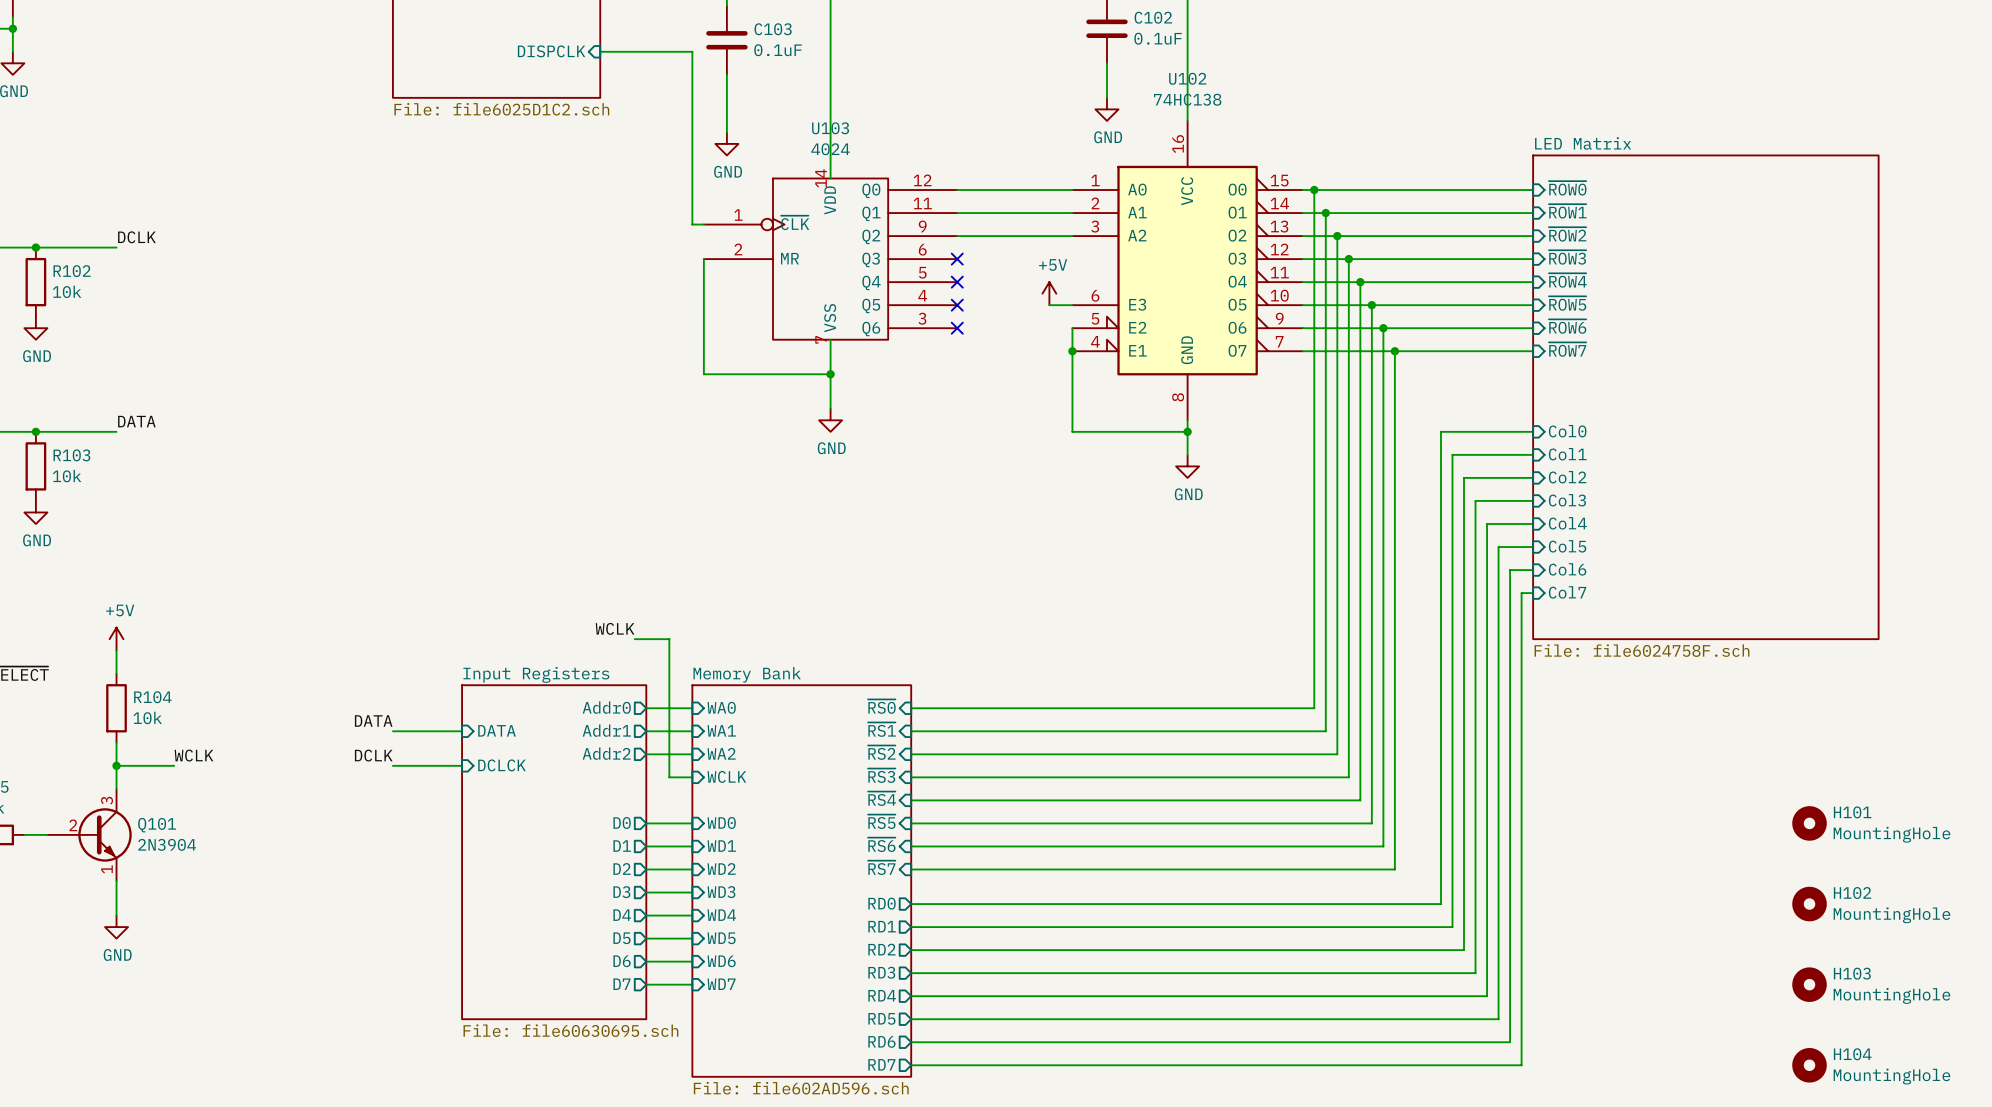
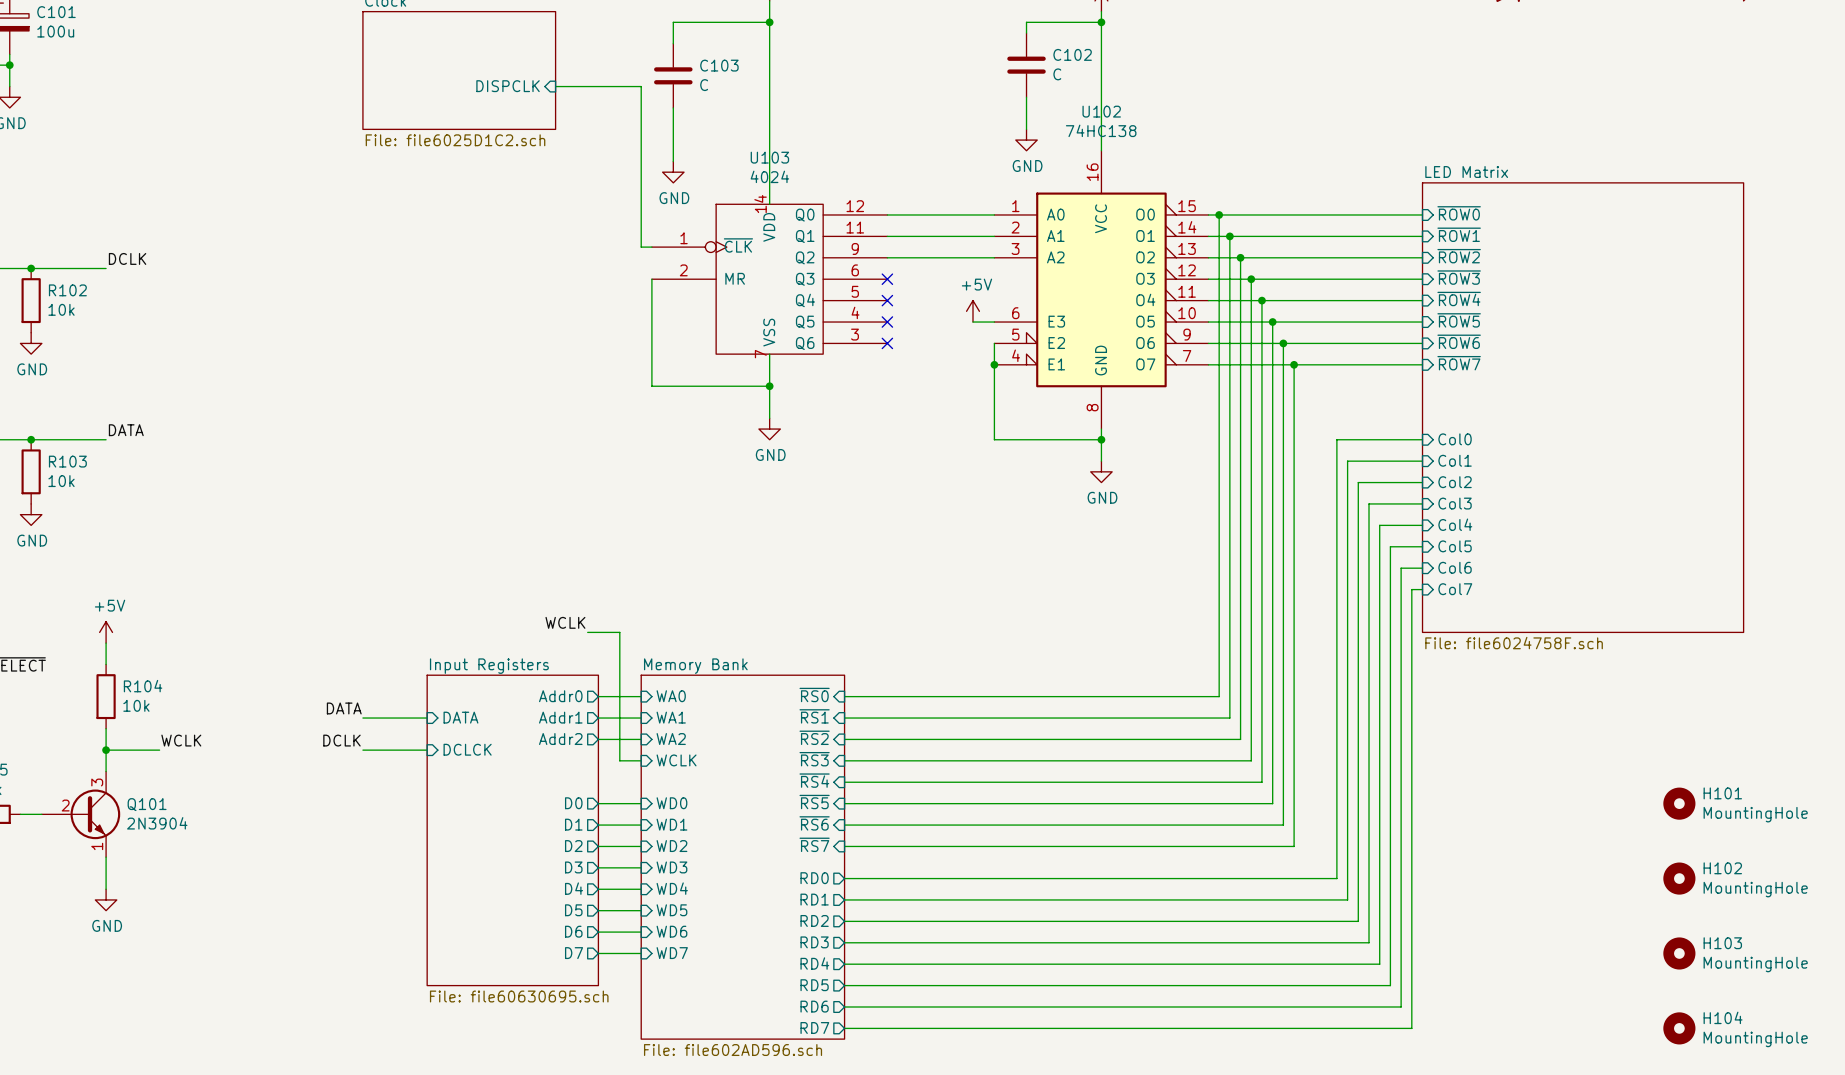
C102 value: 0.1uF (1158, 38) -> C (1057, 74)
C103 value: 0.1uF (778, 50) -> C (704, 85)

